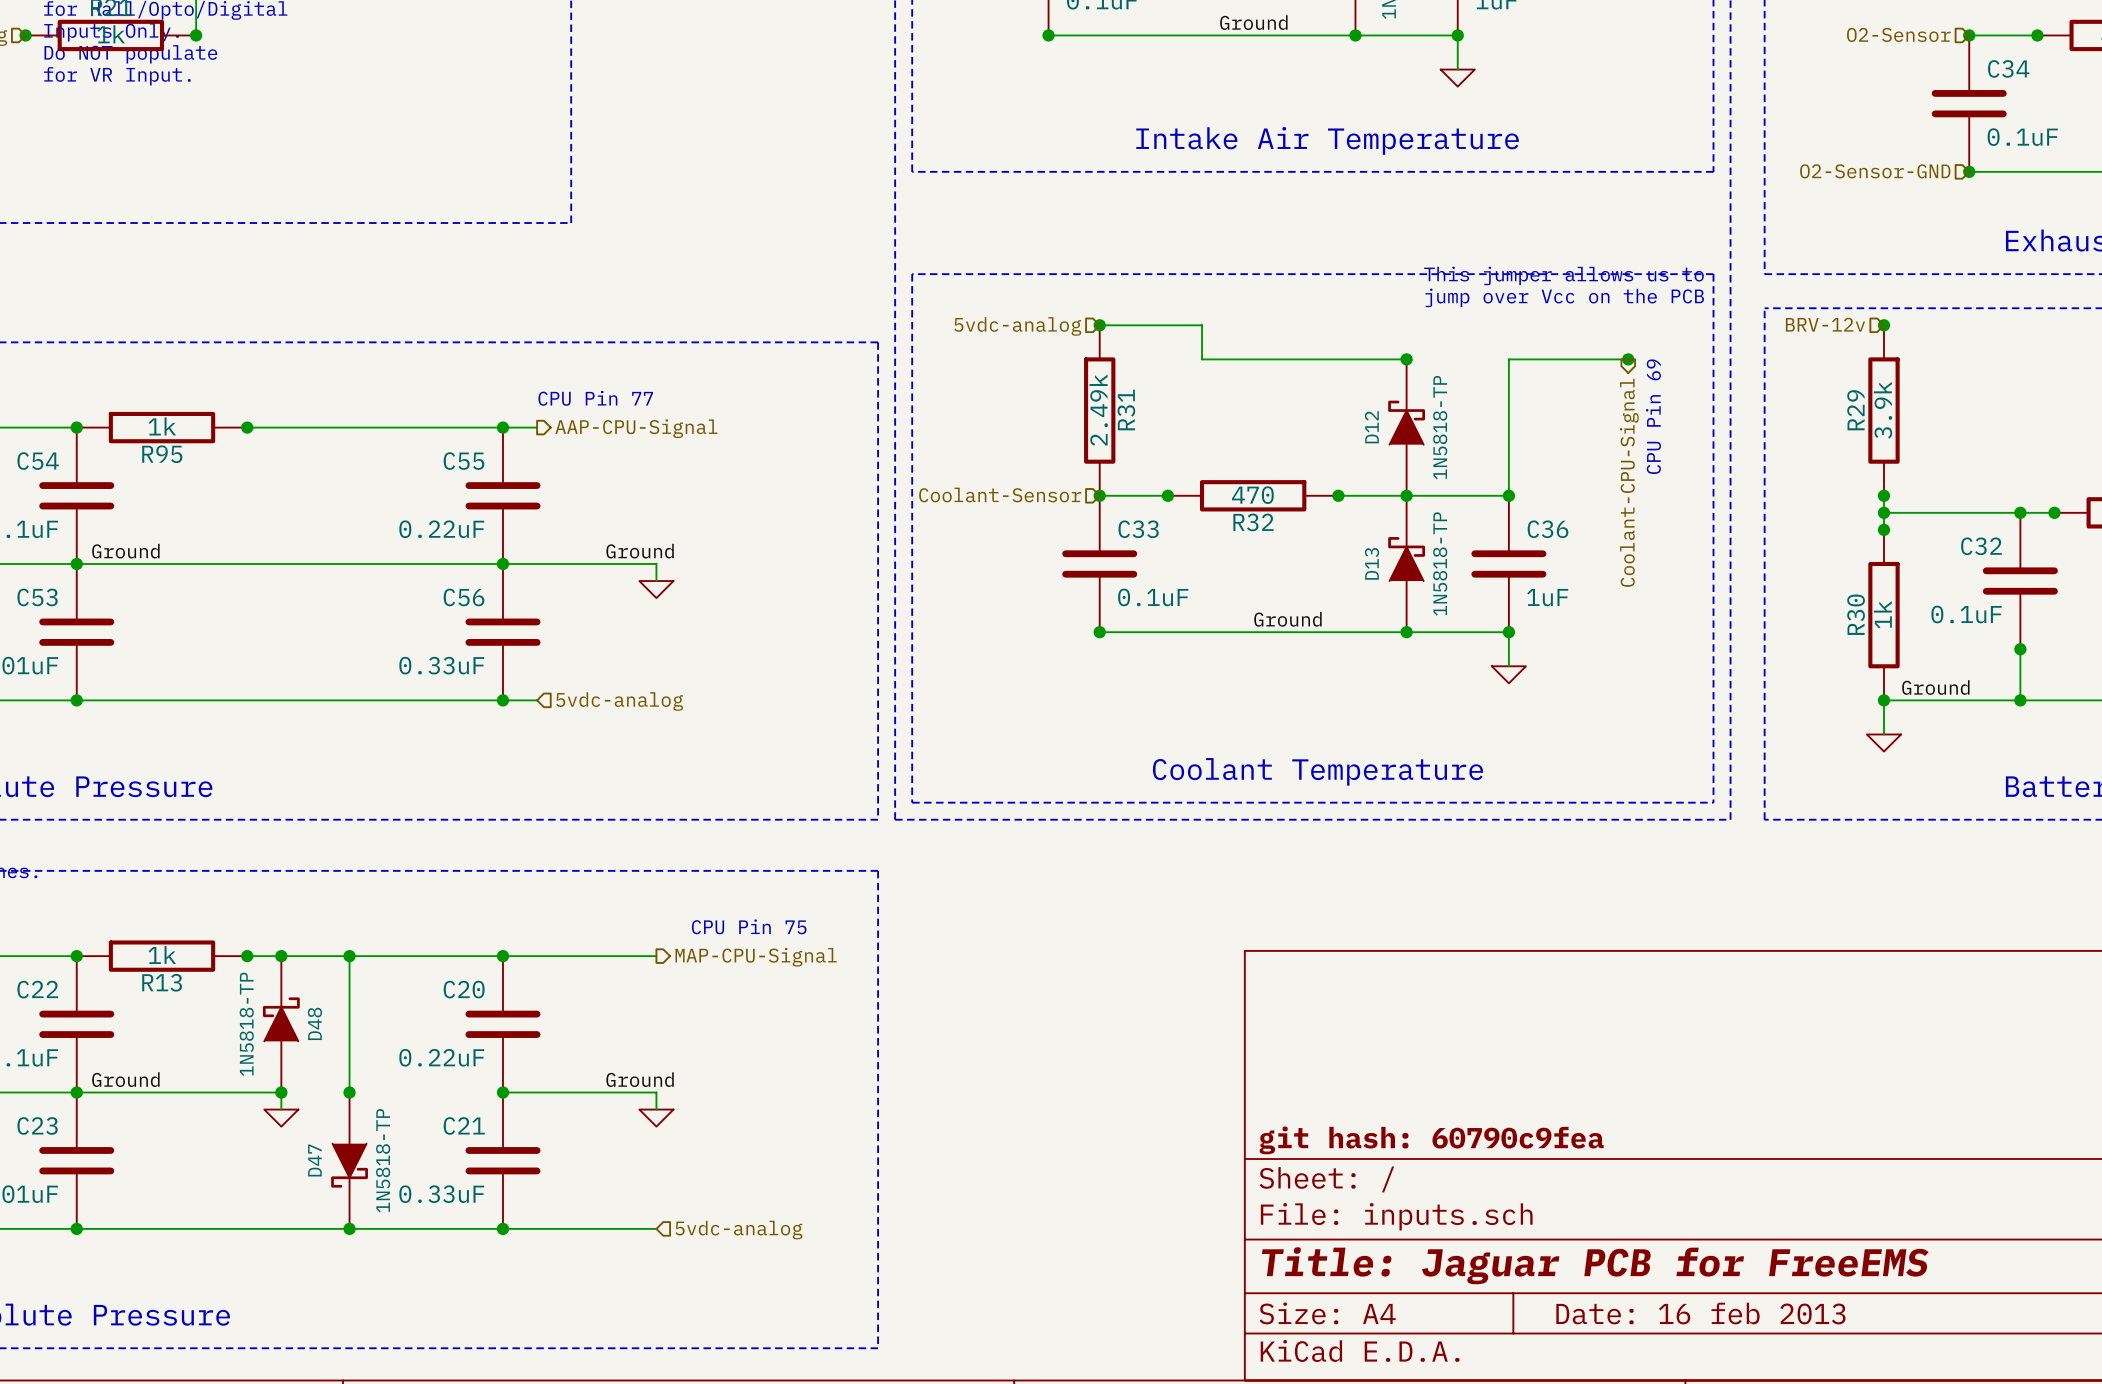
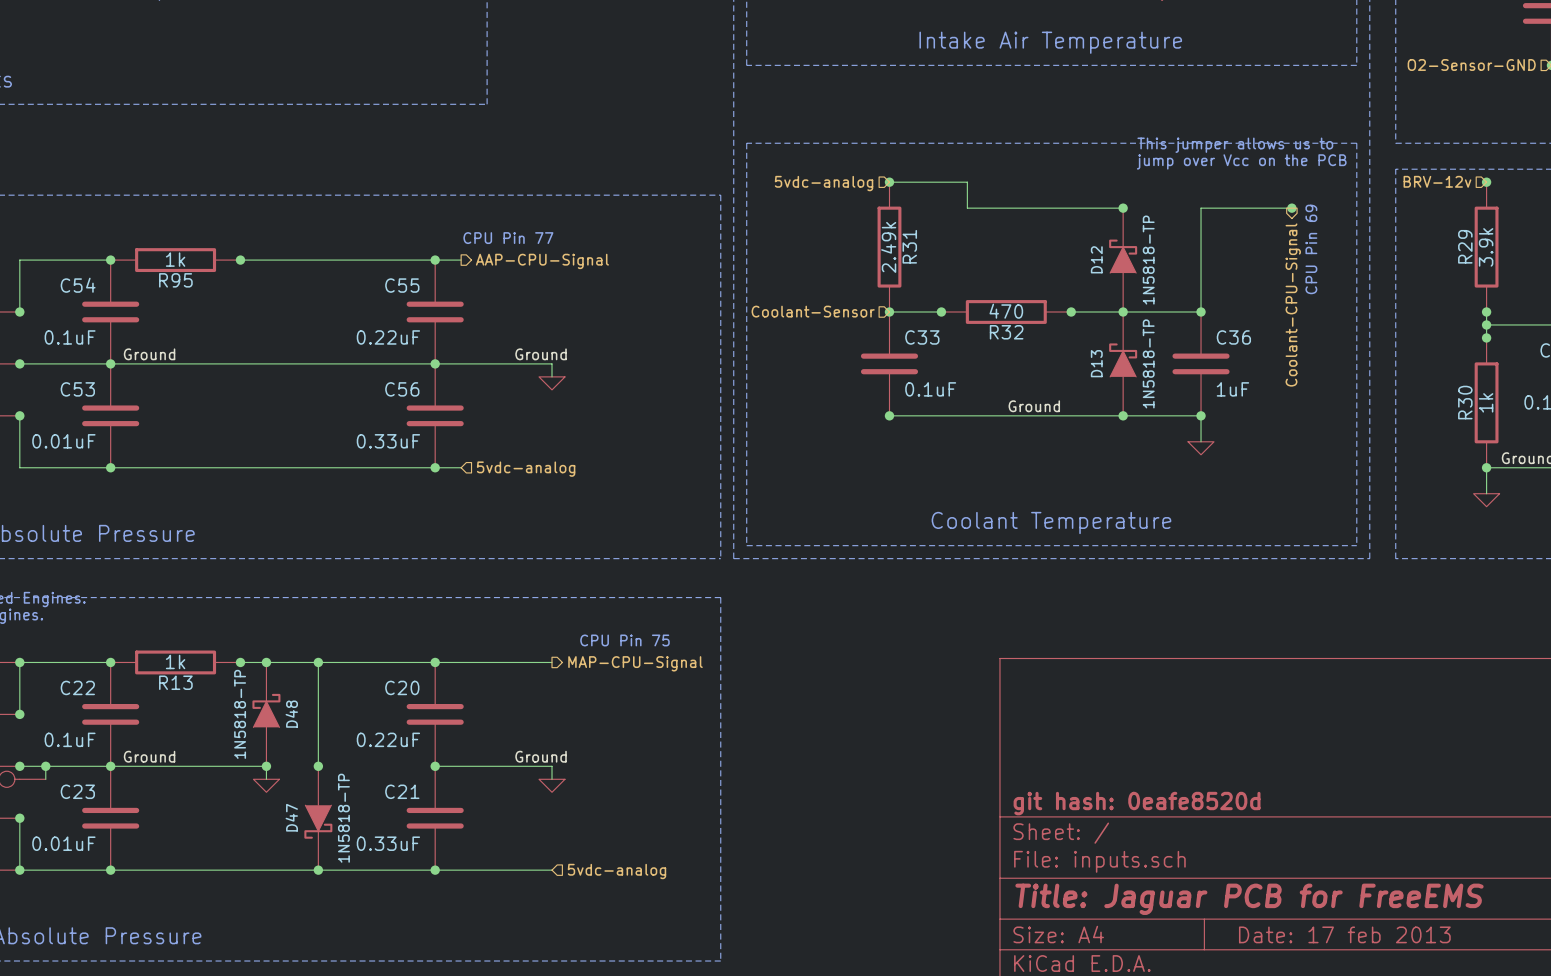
title block: git hash: 60790c9fea (1431, 1140) -> git hash: 0eafe8520d (1137, 803)
title block: Date: 16 feb 2013 (1700, 1313) -> Date: 17 feb 2013 (1344, 934)

